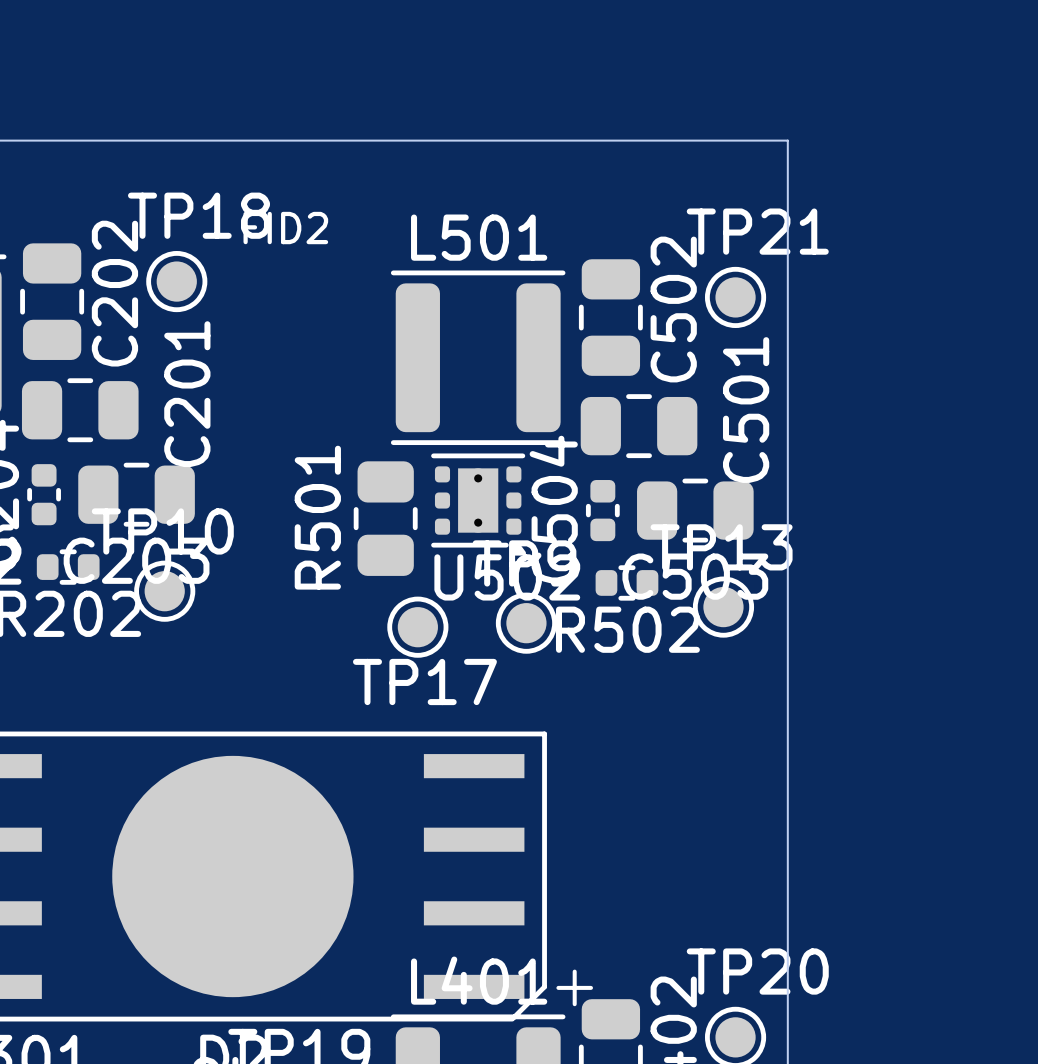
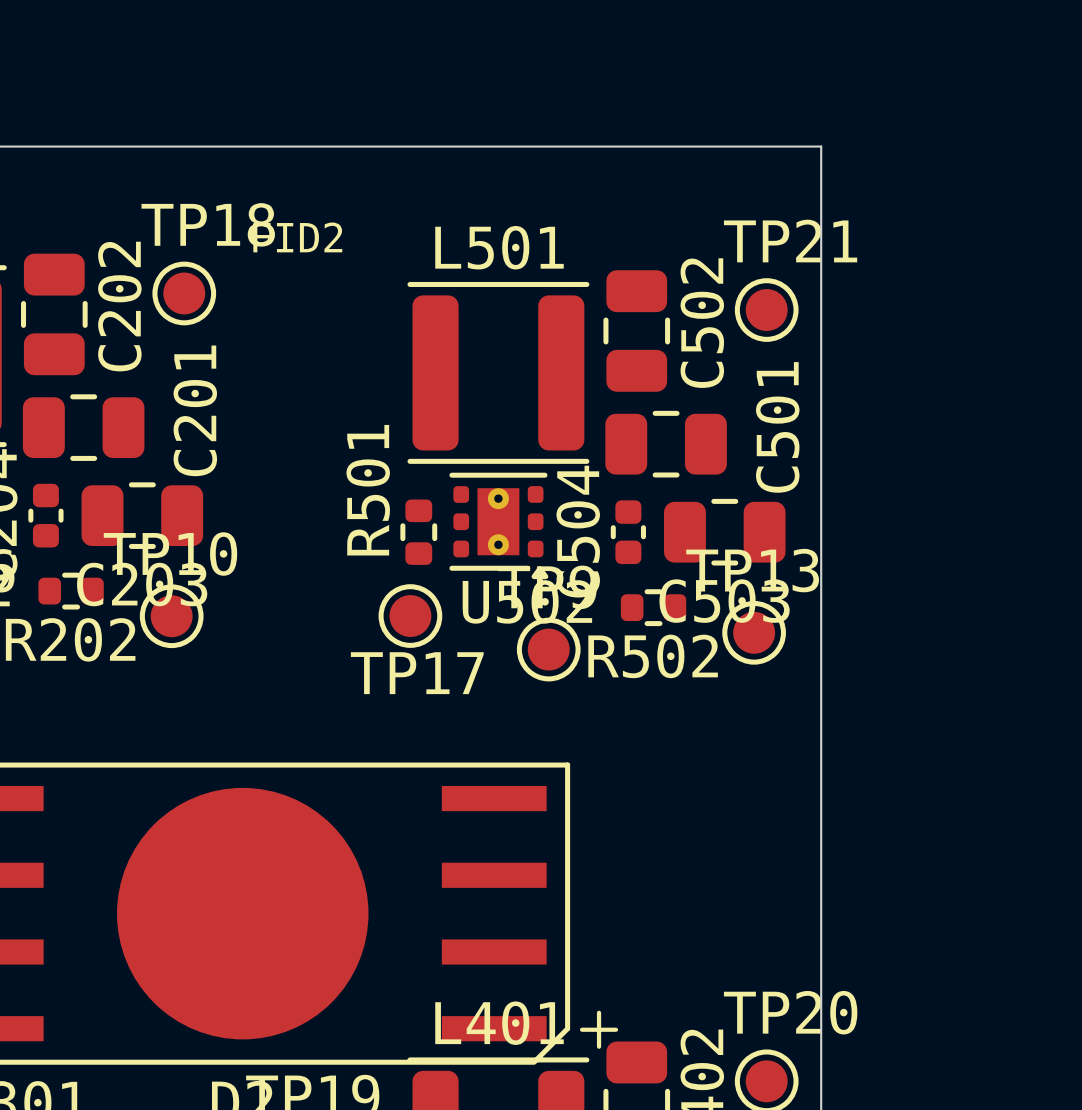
R501 footprint: [353, 461, 418, 576] -> [400, 499, 438, 565]
R501 name position: R501 (317, 517) -> R501 (368, 490)
TP17 position: (417, 627) -> (410, 616)

